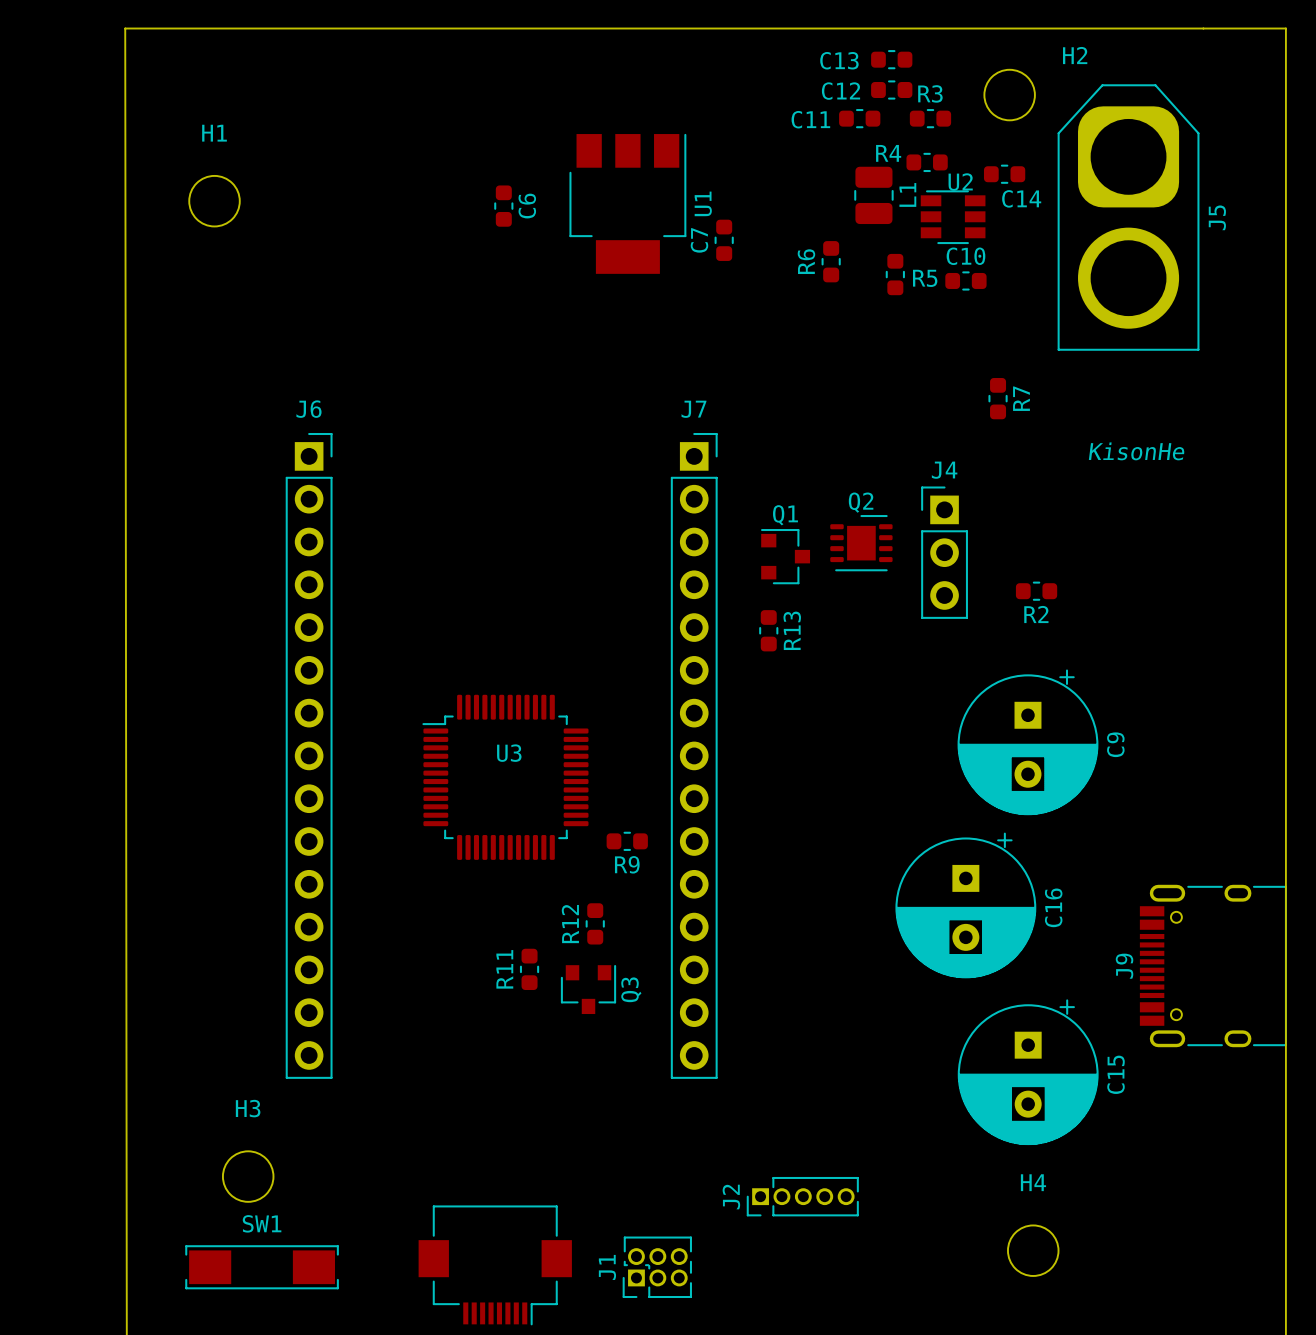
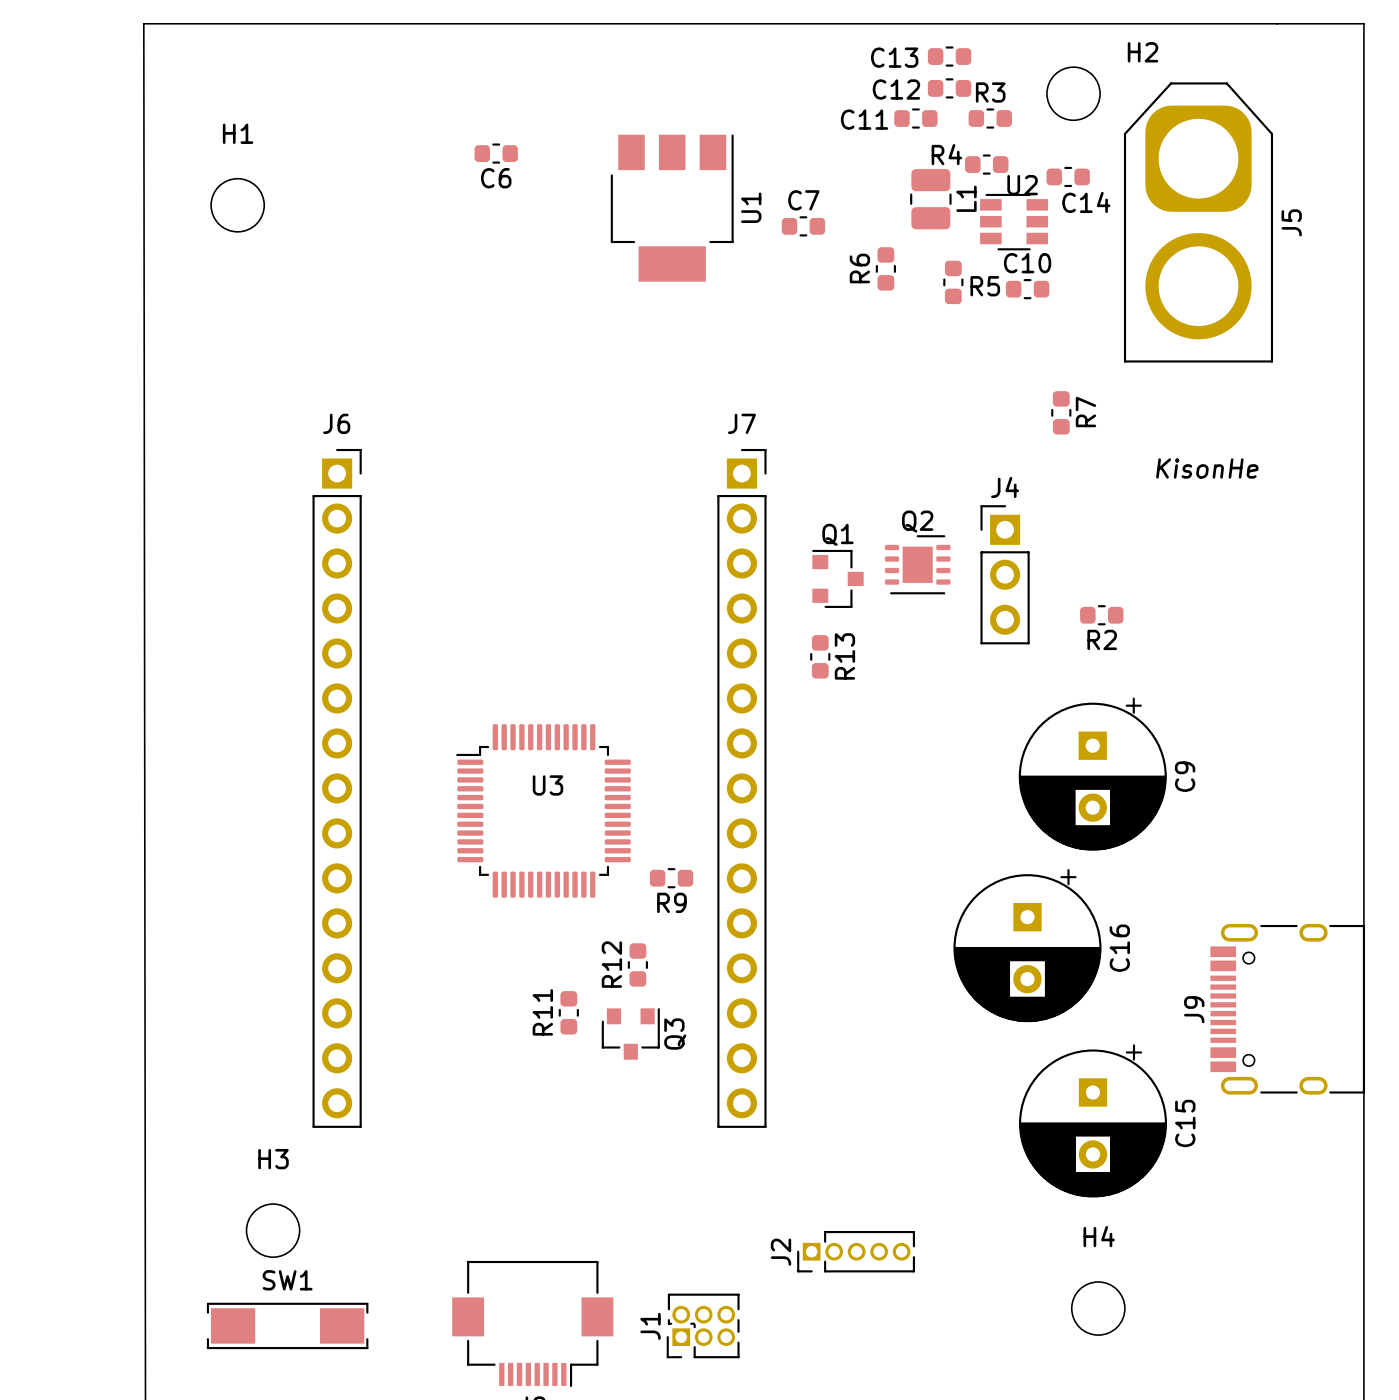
C6 rotation: 0° (503, 206) -> 90° clockwise (496, 153)
C6 position: (503, 206) -> (496, 153)
C7 rotation: 0° (724, 240) -> 90° clockwise (803, 226)
C7 position: (724, 240) -> (803, 226)

